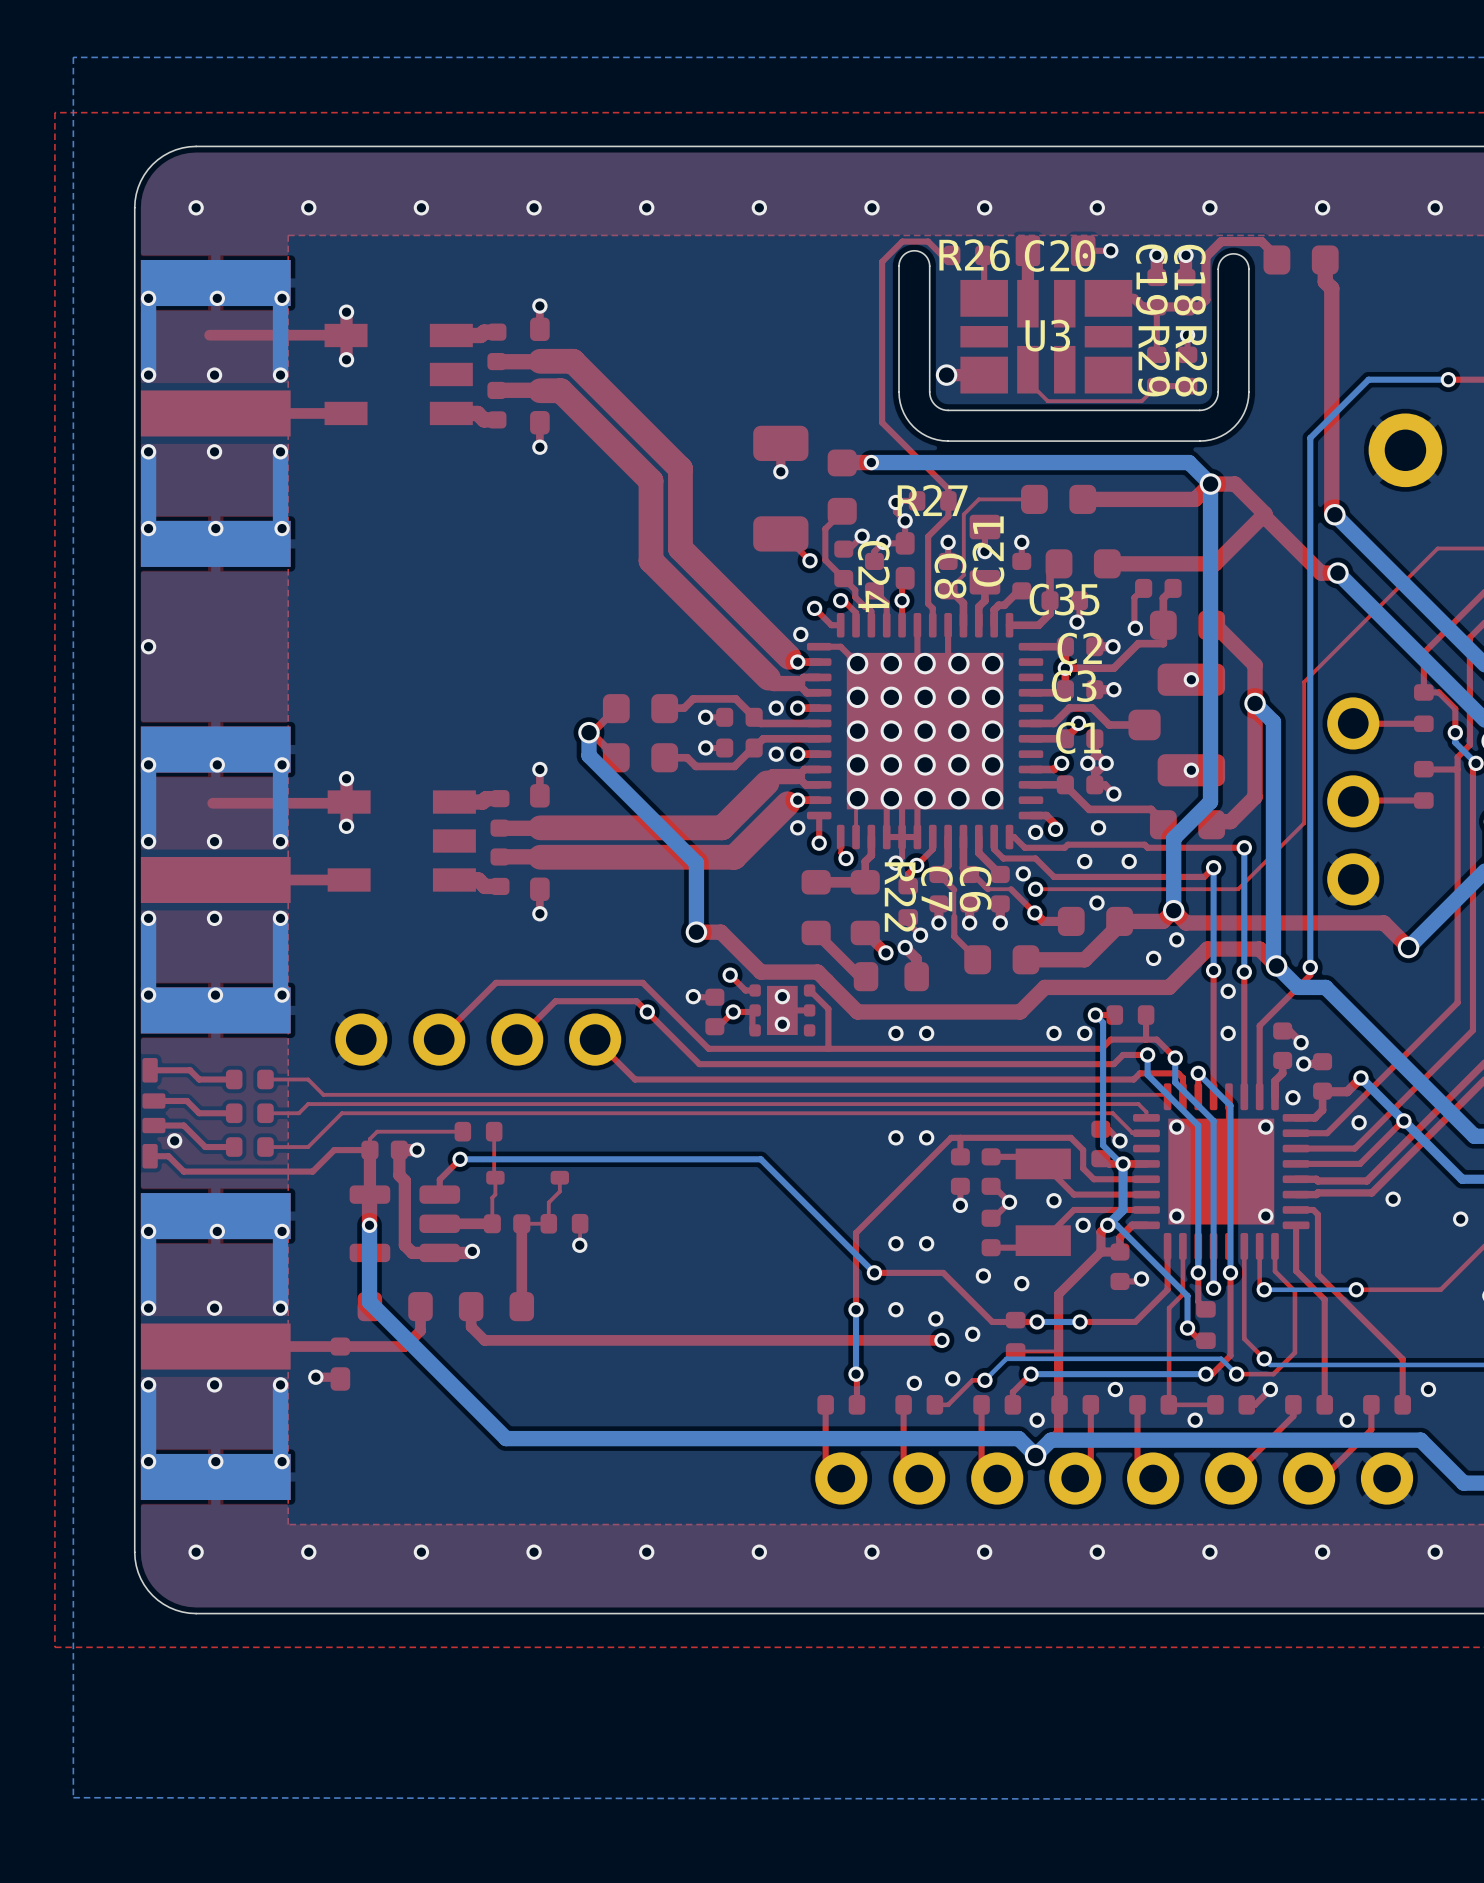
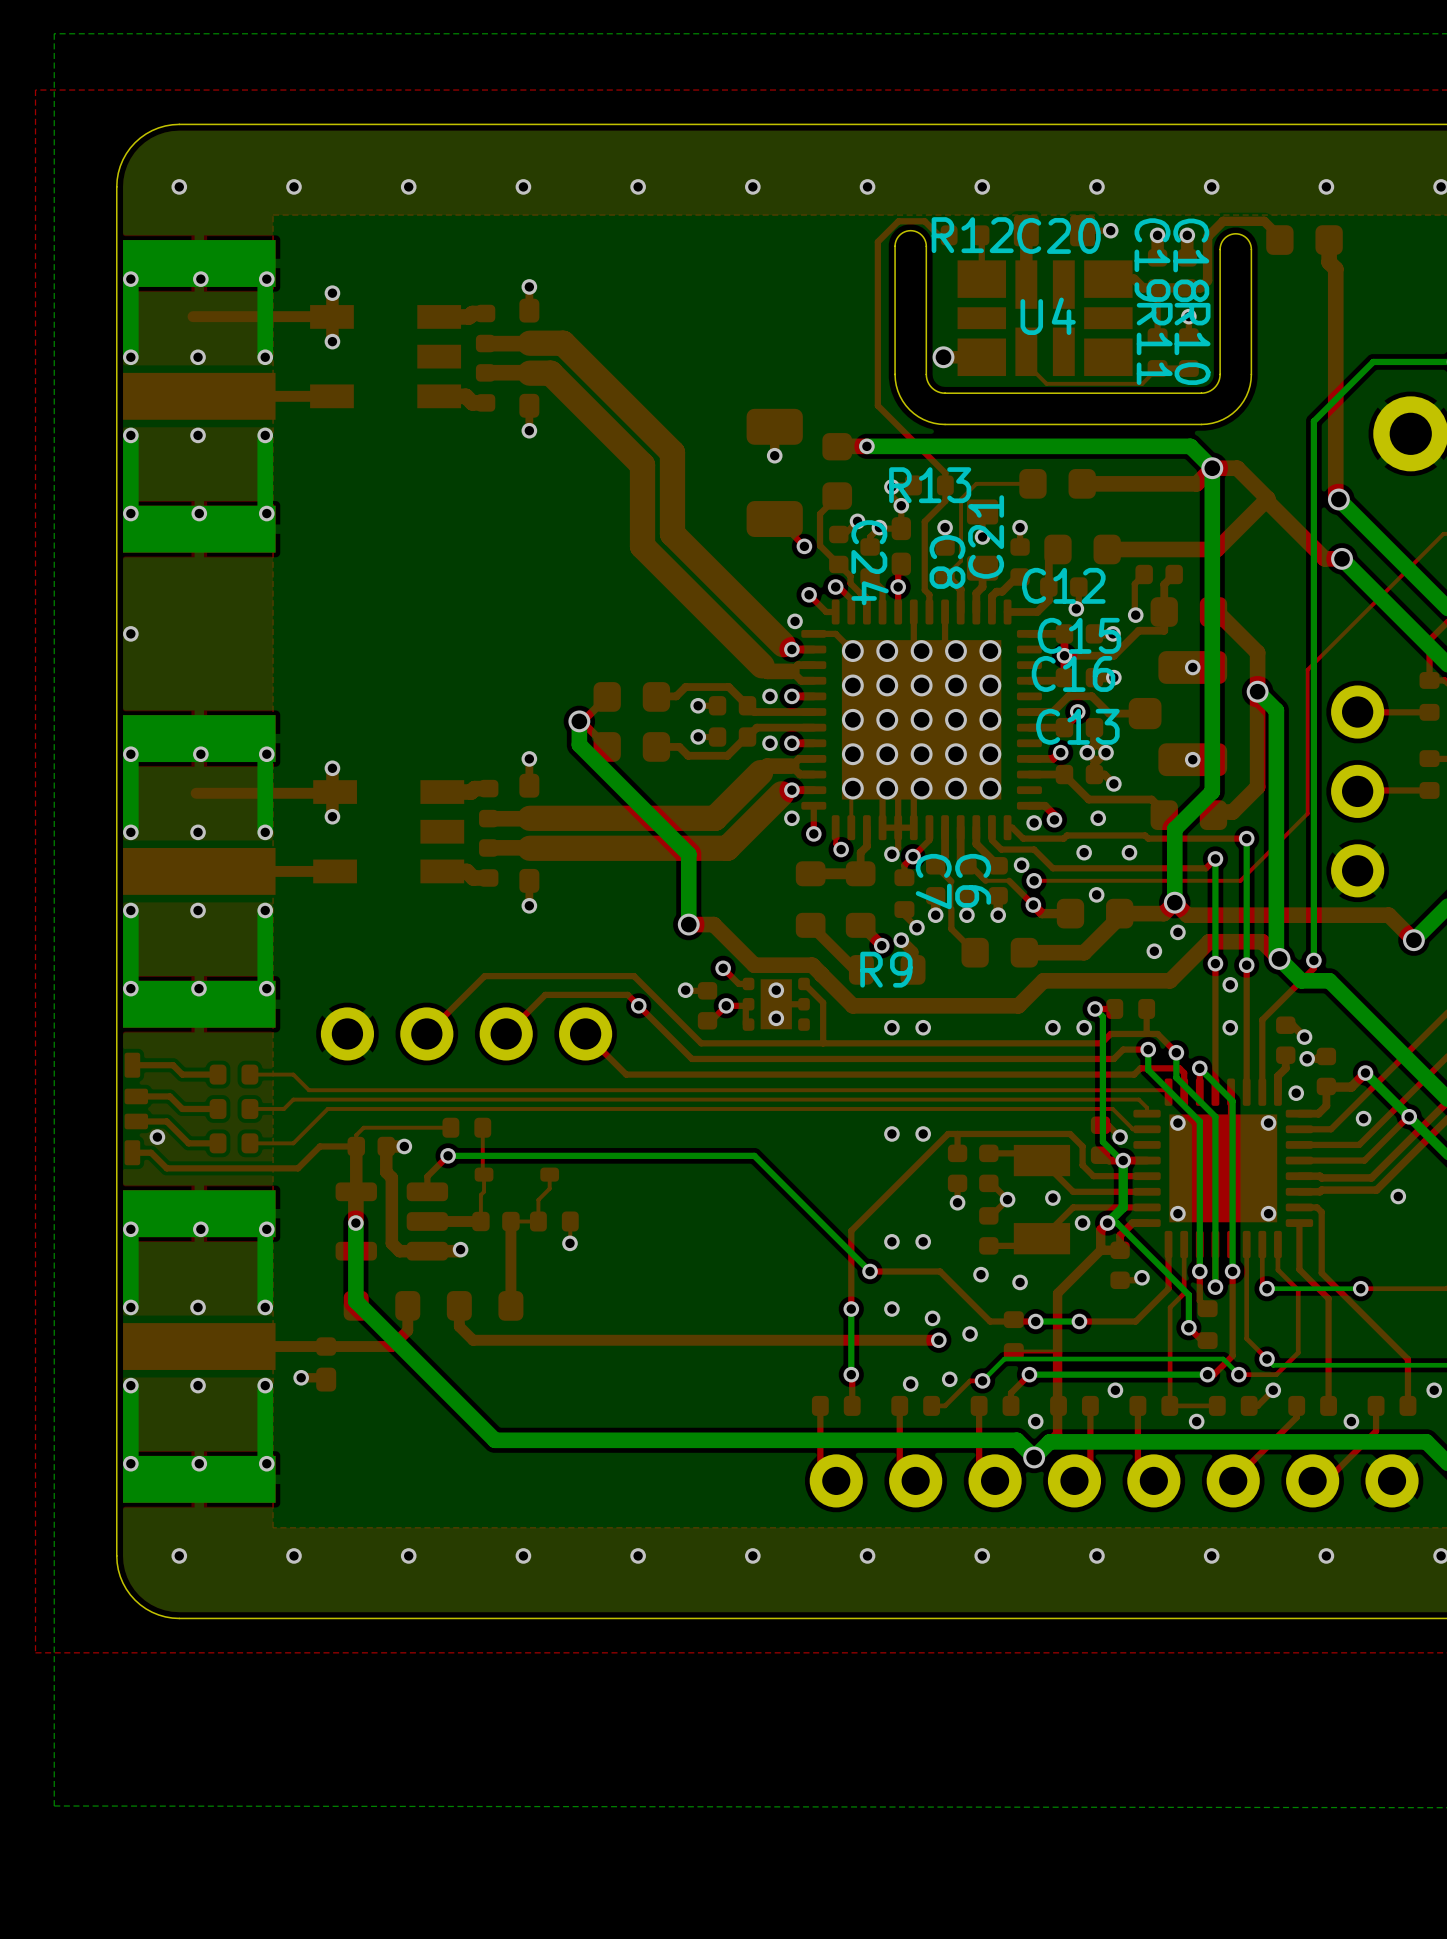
R26 name: R26 (974, 255) -> R12 (972, 235)
U3 name: U3 (1047, 335) -> U4 (1048, 316)
R29 name: R29 (1153, 361) -> R11 (1154, 343)
R28 name: R28 (1191, 361) -> R10 (1192, 343)
R27 name: R27 (932, 500) -> R13 (930, 485)
C35 name: C35 (1064, 599) -> C12 (1063, 585)
C2 name: C2 (1079, 648) -> C15 (1079, 635)
C3 name: C3 (1074, 686) -> C16 (1073, 673)
C1 name: C1 (1078, 737) -> C13 (1077, 726)
R22 name: R22 (900, 897) -> none
R9 name: none -> R9 (886, 969)

